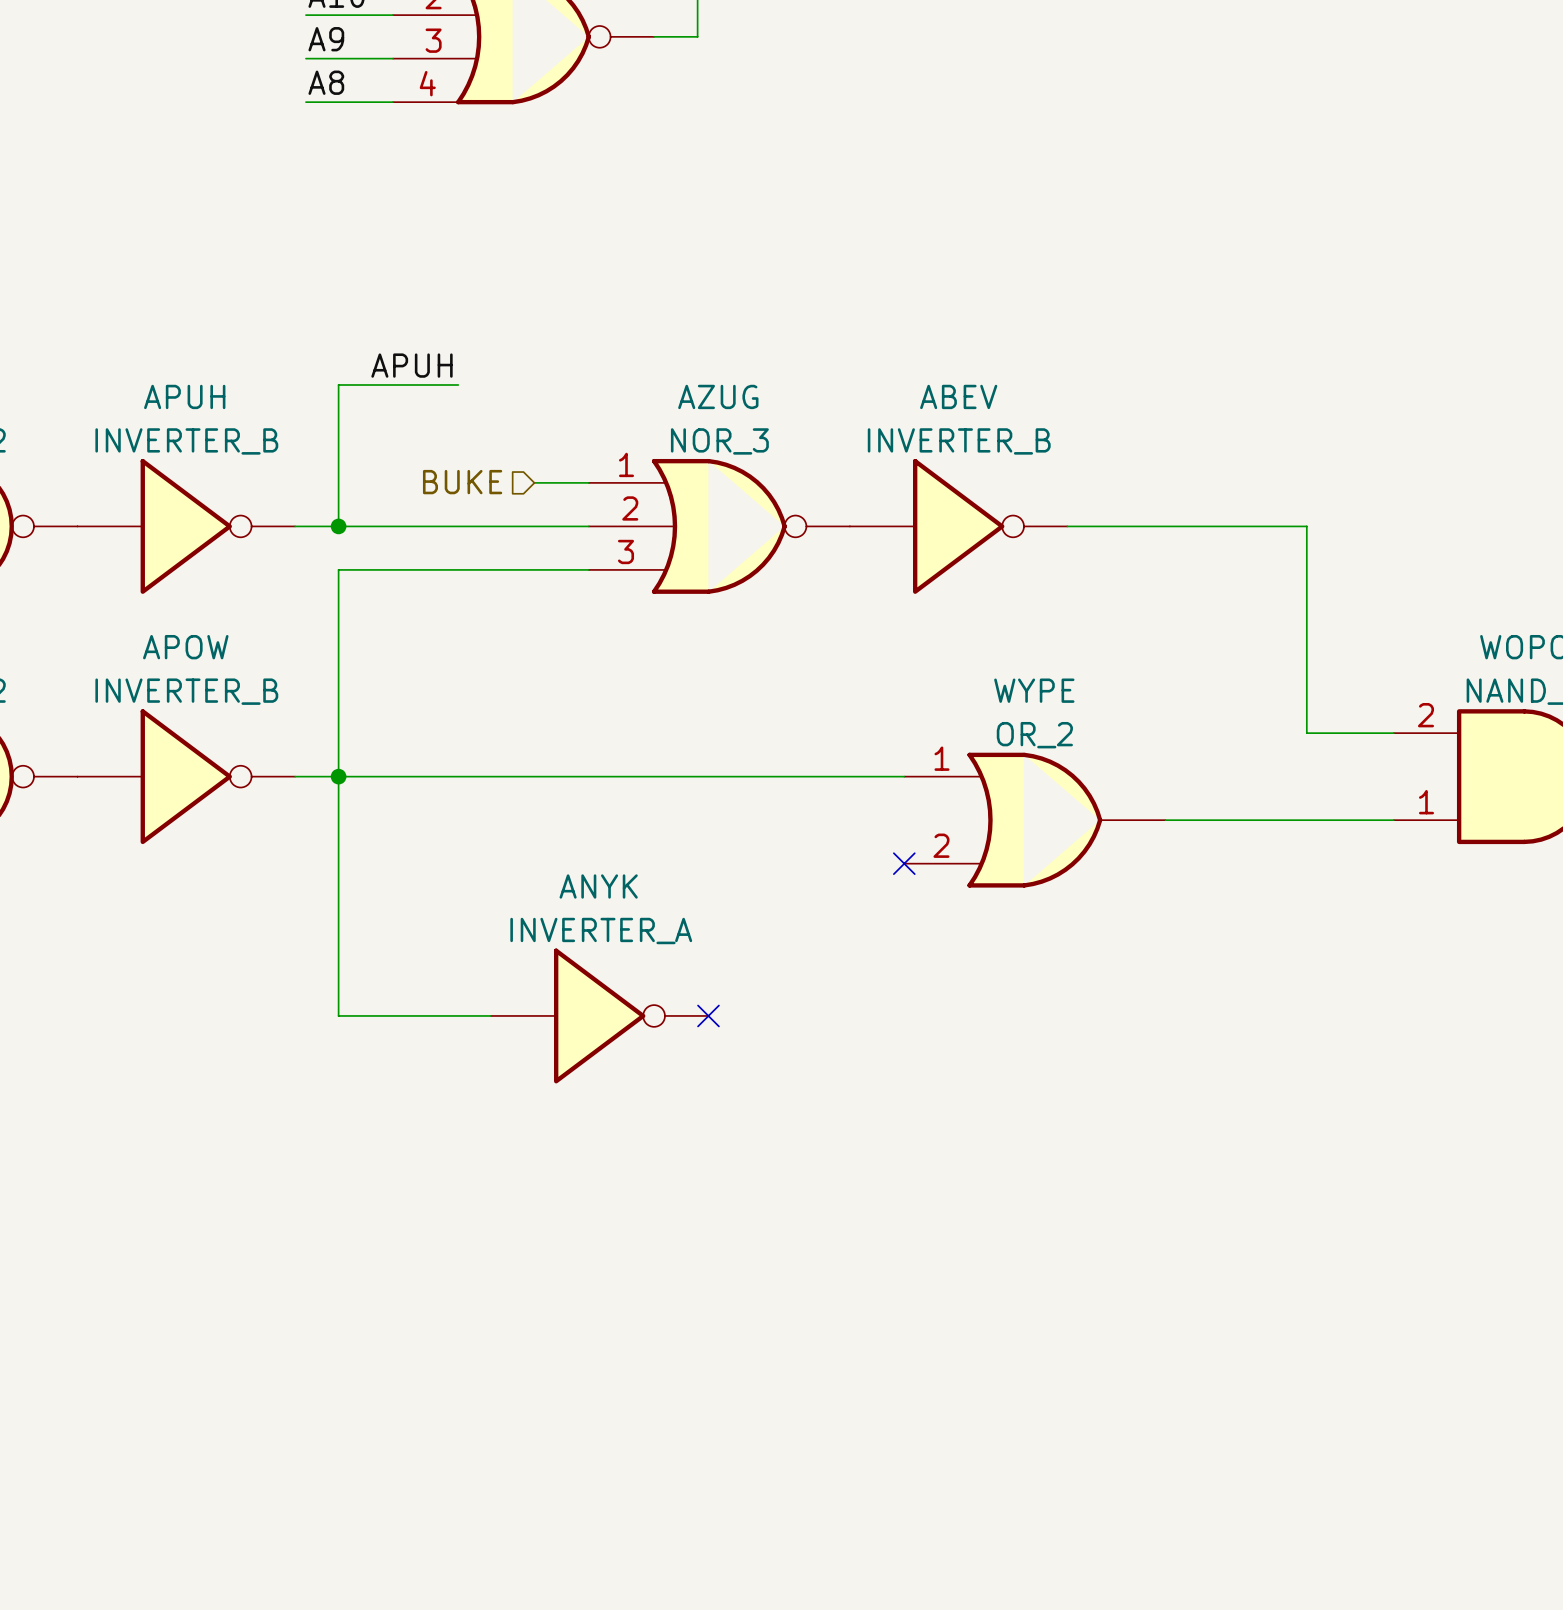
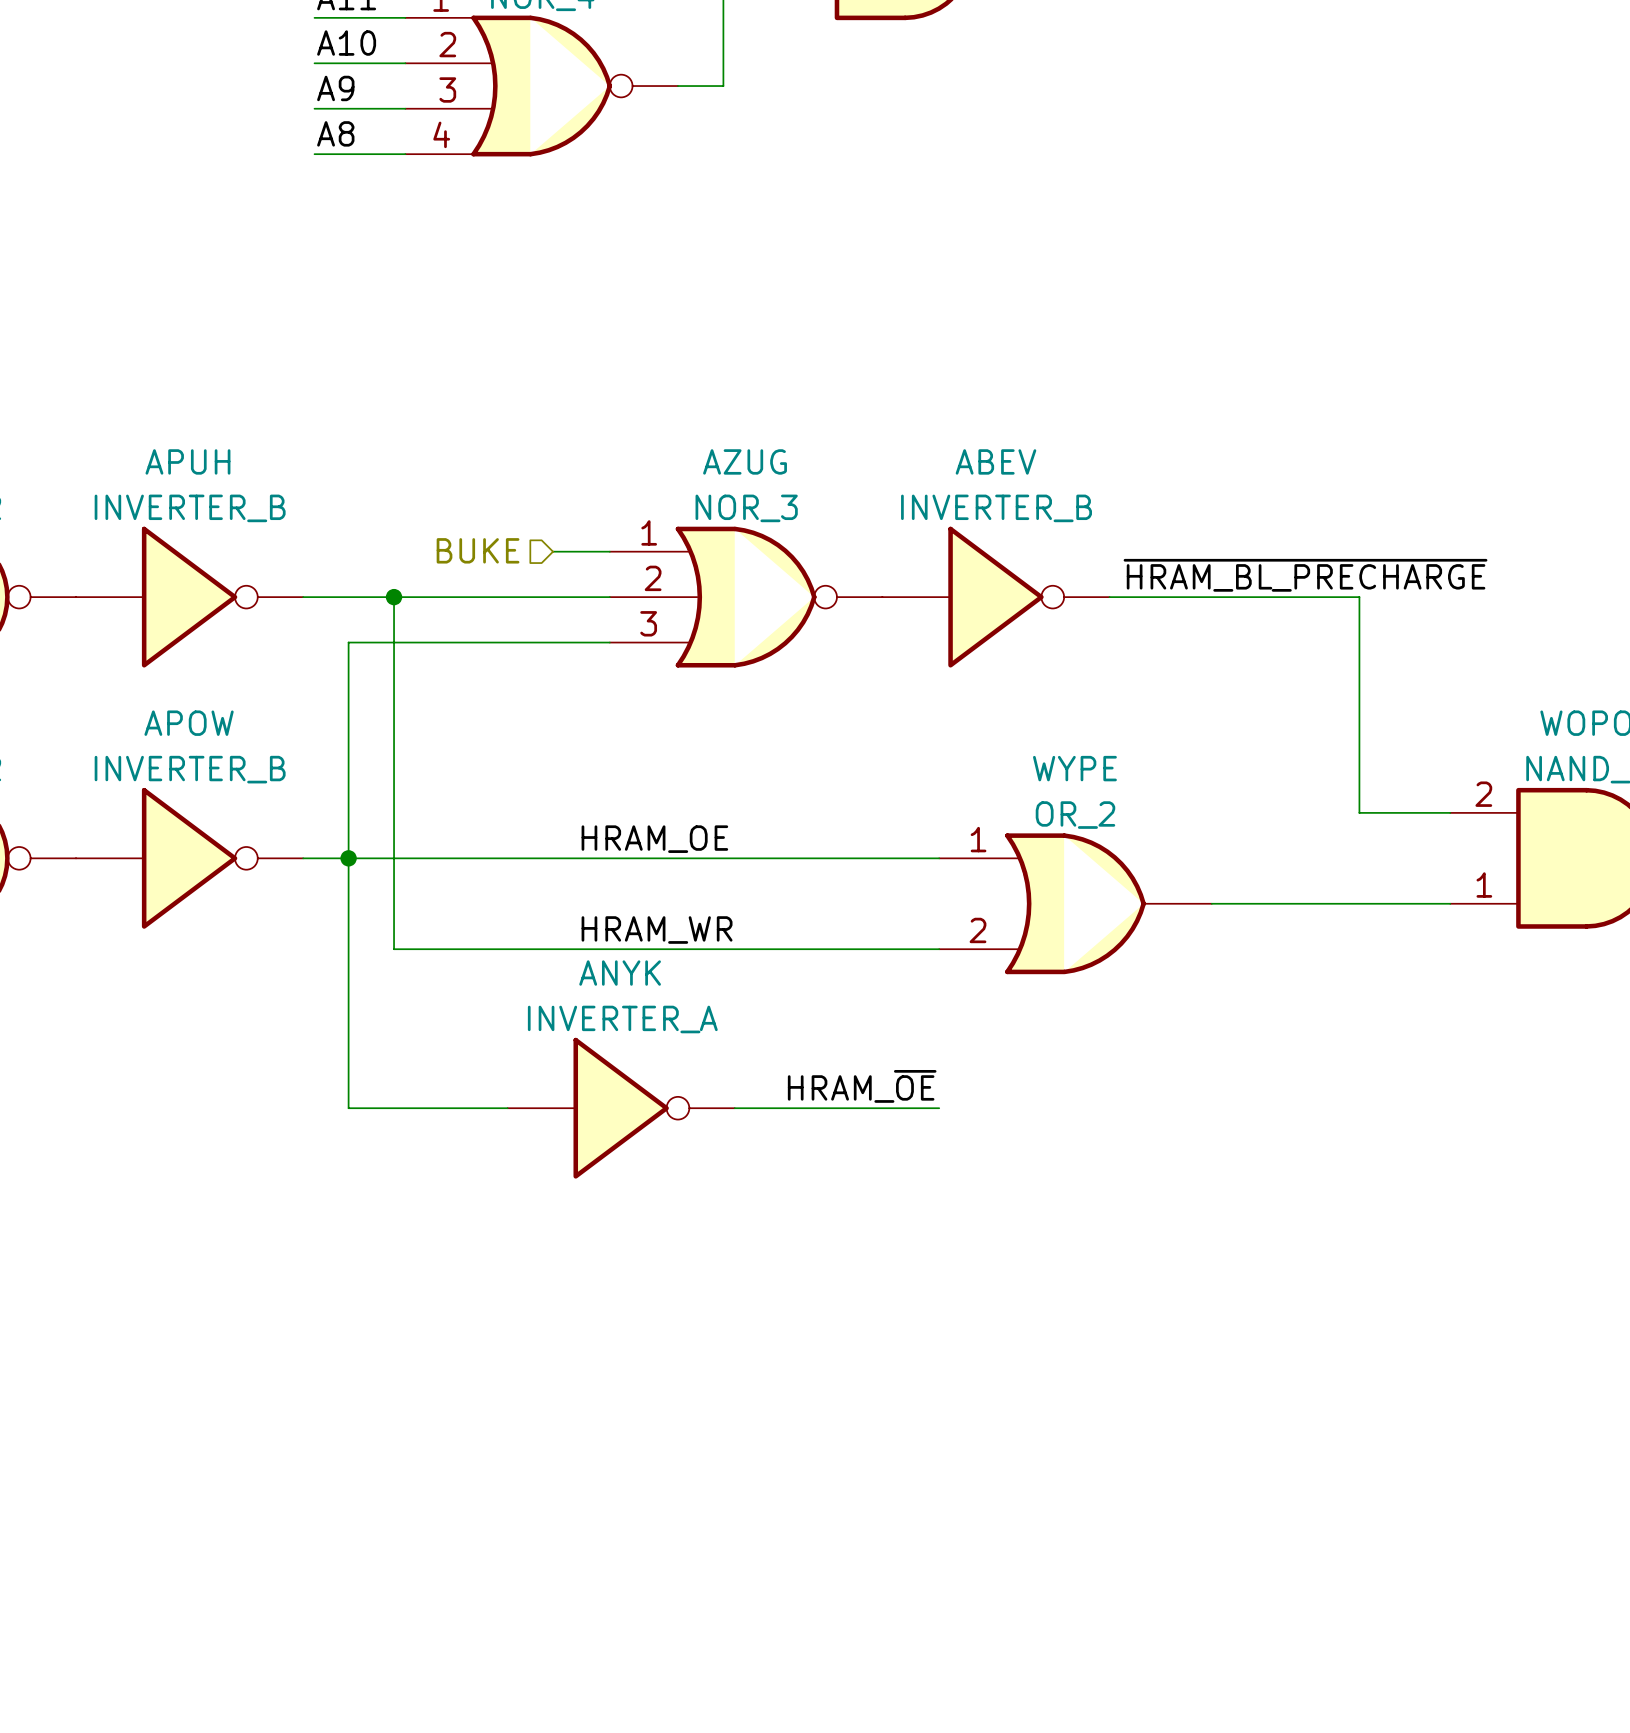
label: APUH (412, 365) -> none
wire: (458, 384) (338, 384) (338, 526) -> none
label: none -> ~{HRAM_BL_PRECHARGE} (1305, 575)
junction position: (338, 526) -> (394, 597)
wire: none -> (394, 597) (394, 949) (939, 949)
label: none -> HRAM_OE (654, 839)
label: none -> HRAM_WR (657, 930)
no-connect mark: (904, 863) -> none
label: none -> HRAM_~{OE} (862, 1086)
wire: none -> (734, 1108) (939, 1108)
no-connect mark: (708, 1015) -> none

